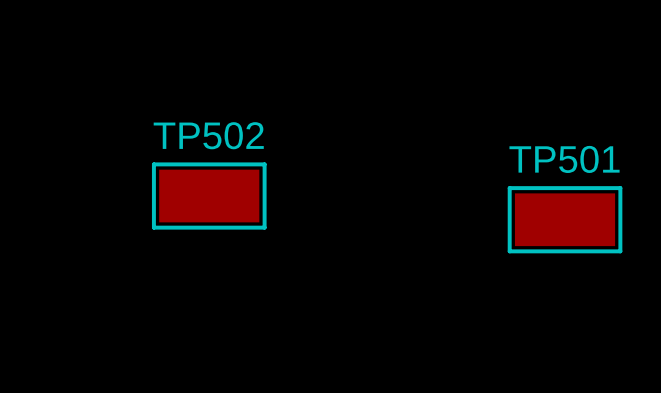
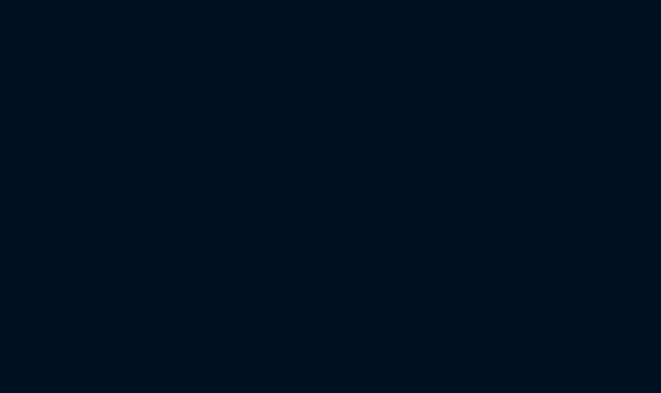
TP502: (209, 196) -> none
TP501: (565, 219) -> none

